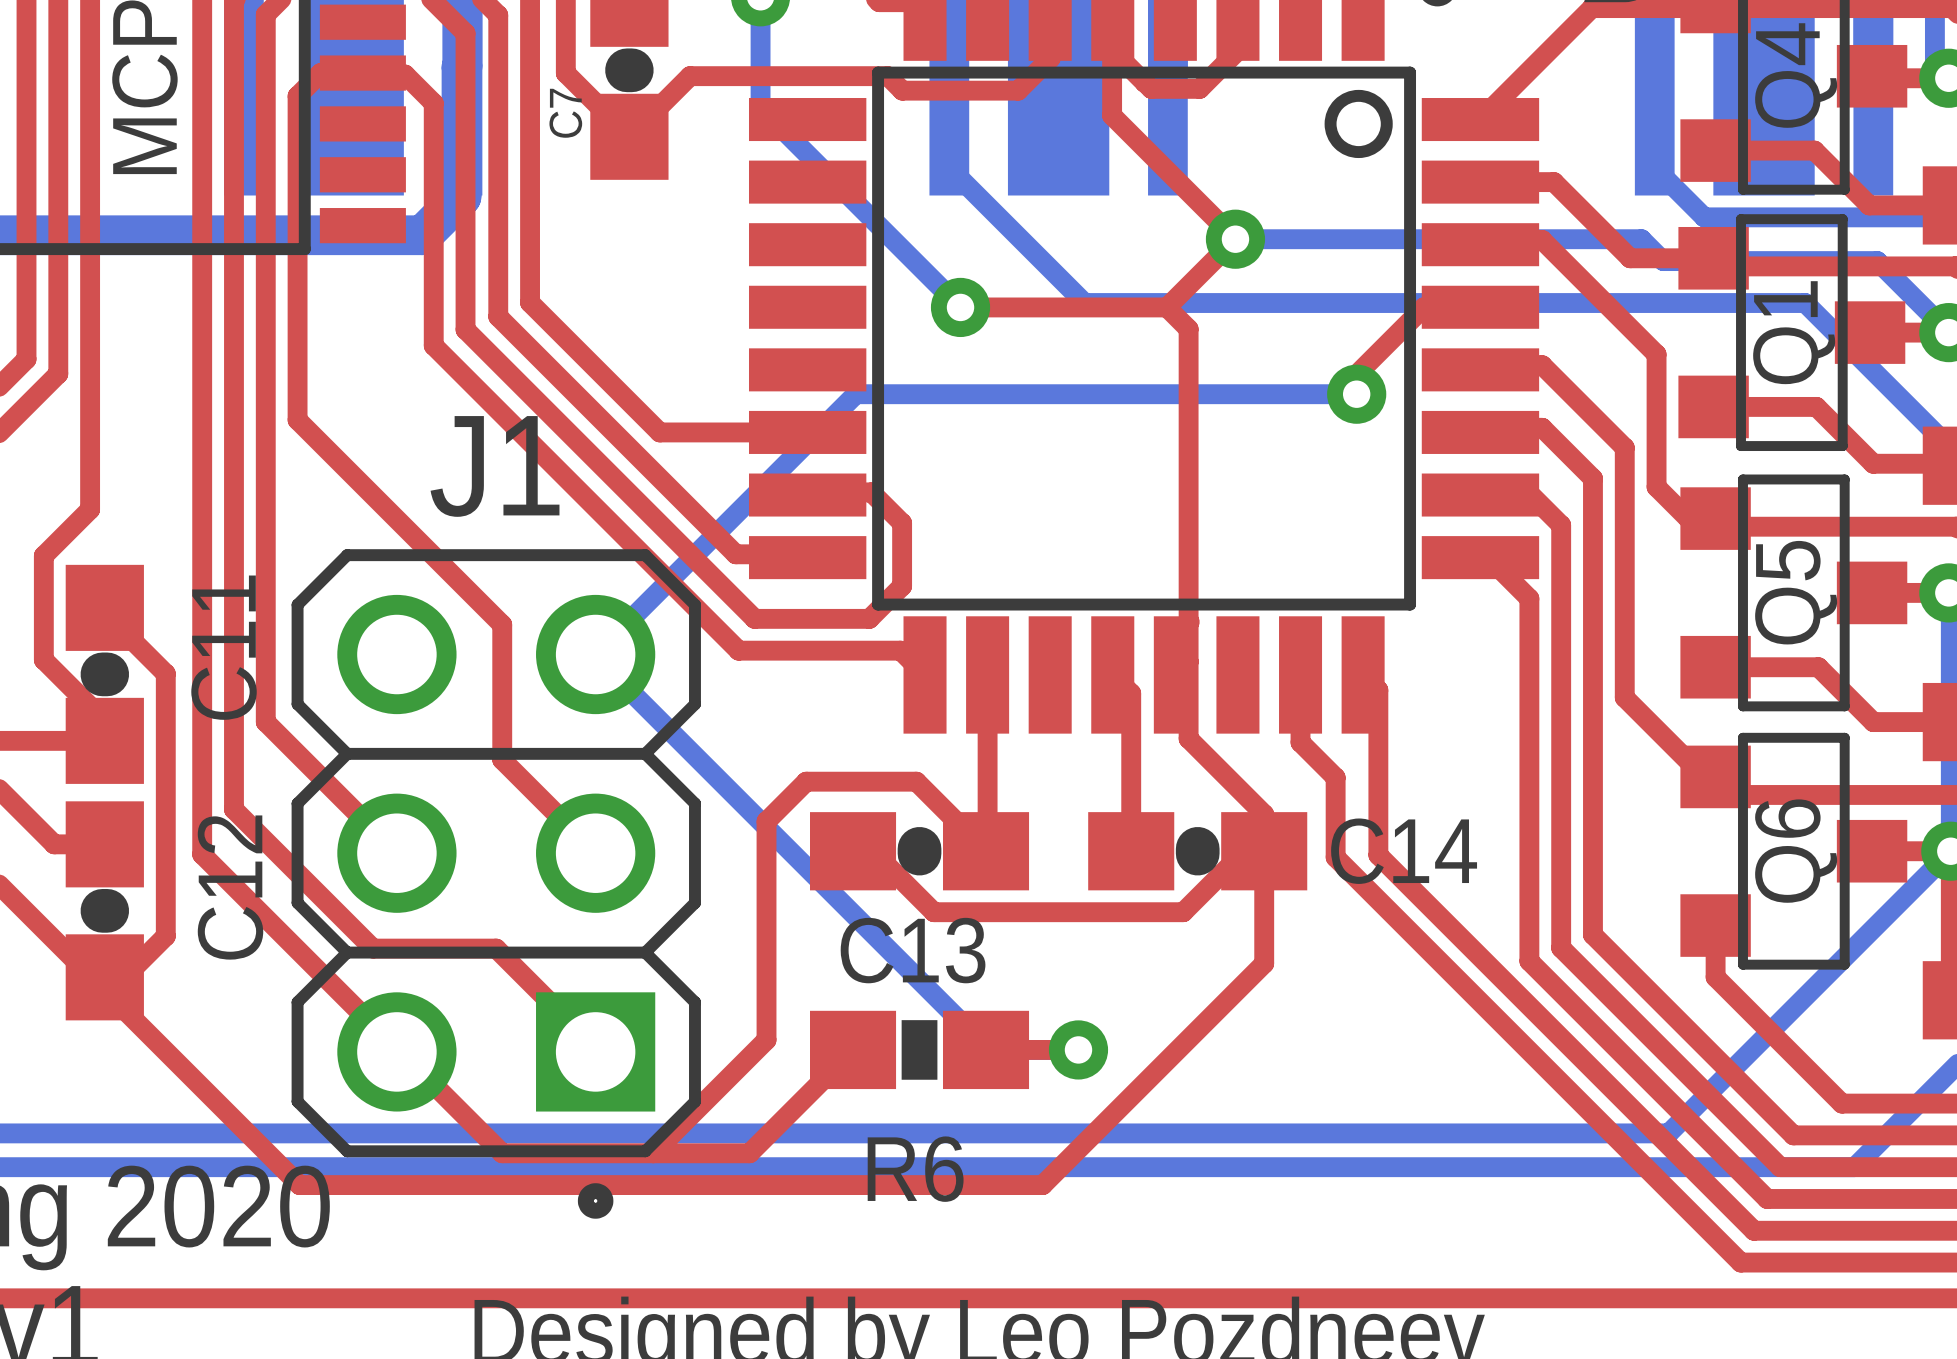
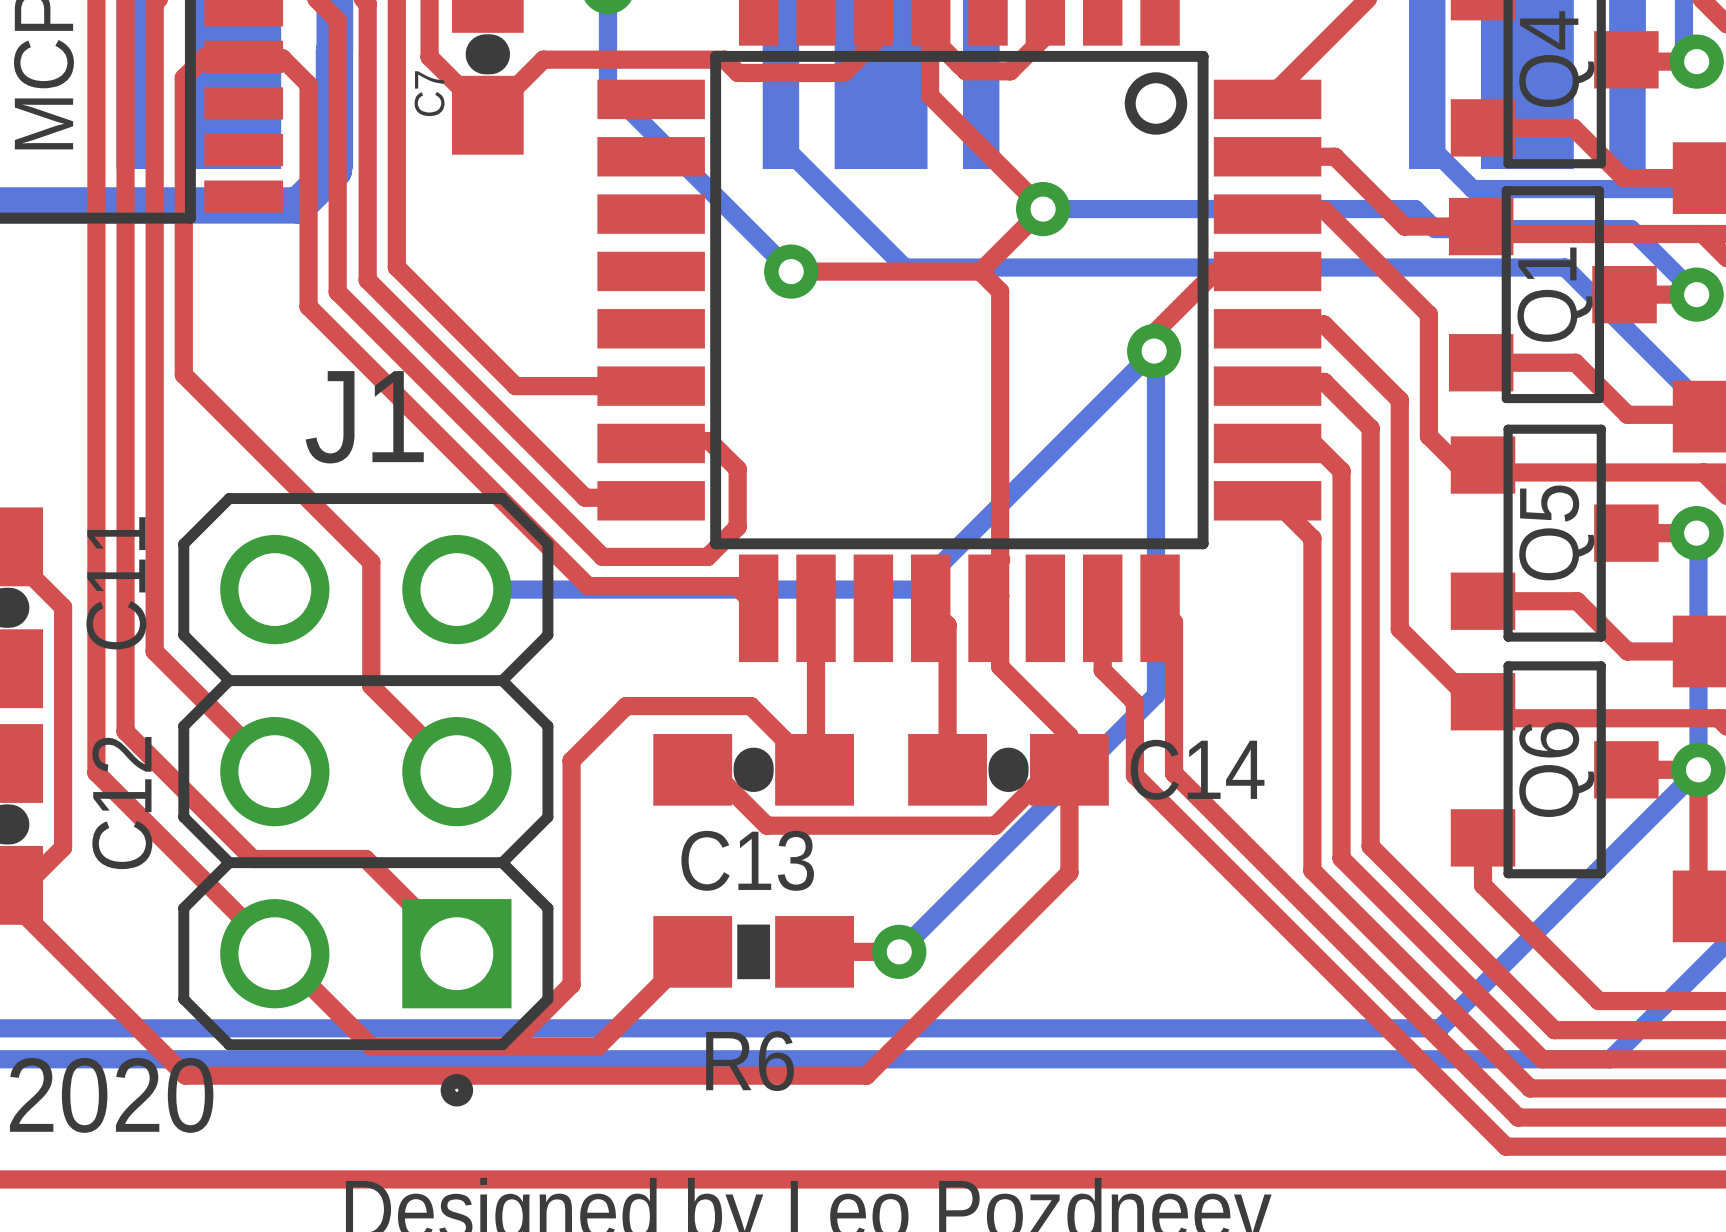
bottom track: (1356, 394) (855, 394) (595, 654) (989, 1049) (1078, 1049) -> (456, 589) (915, 589) (1154, 351) (1155, 352) (1155, 695) (899, 951)
top track: (806, 781) (766, 821) (766, 1040) (720, 1085) -> (649, 706) (626, 706) (571, 760) (571, 984)

